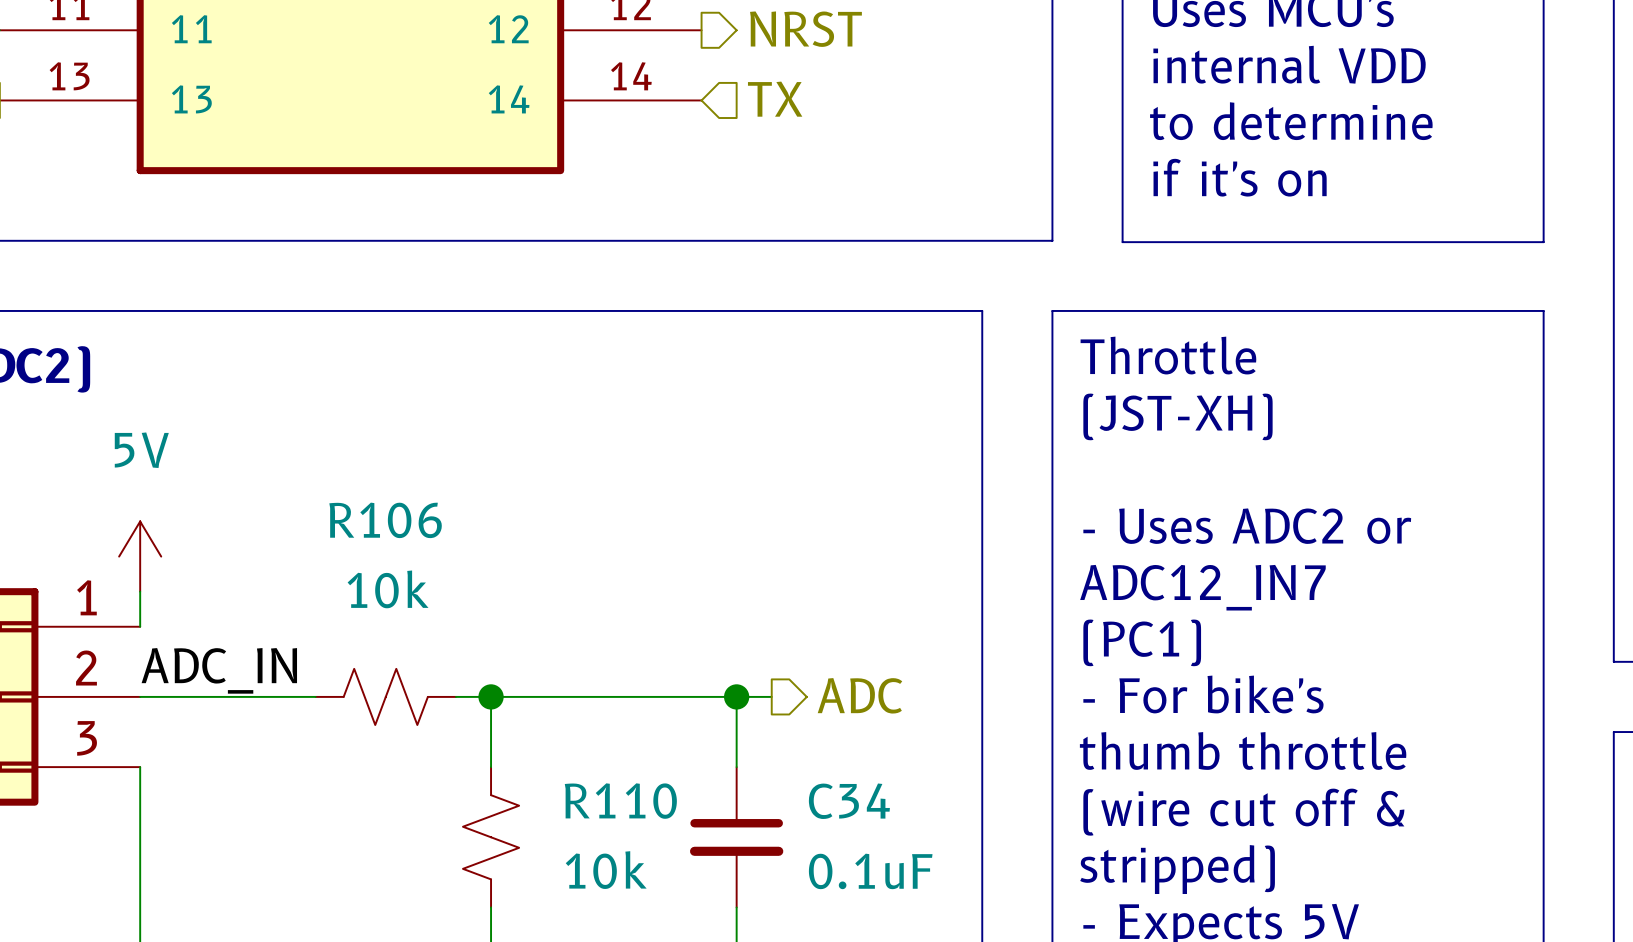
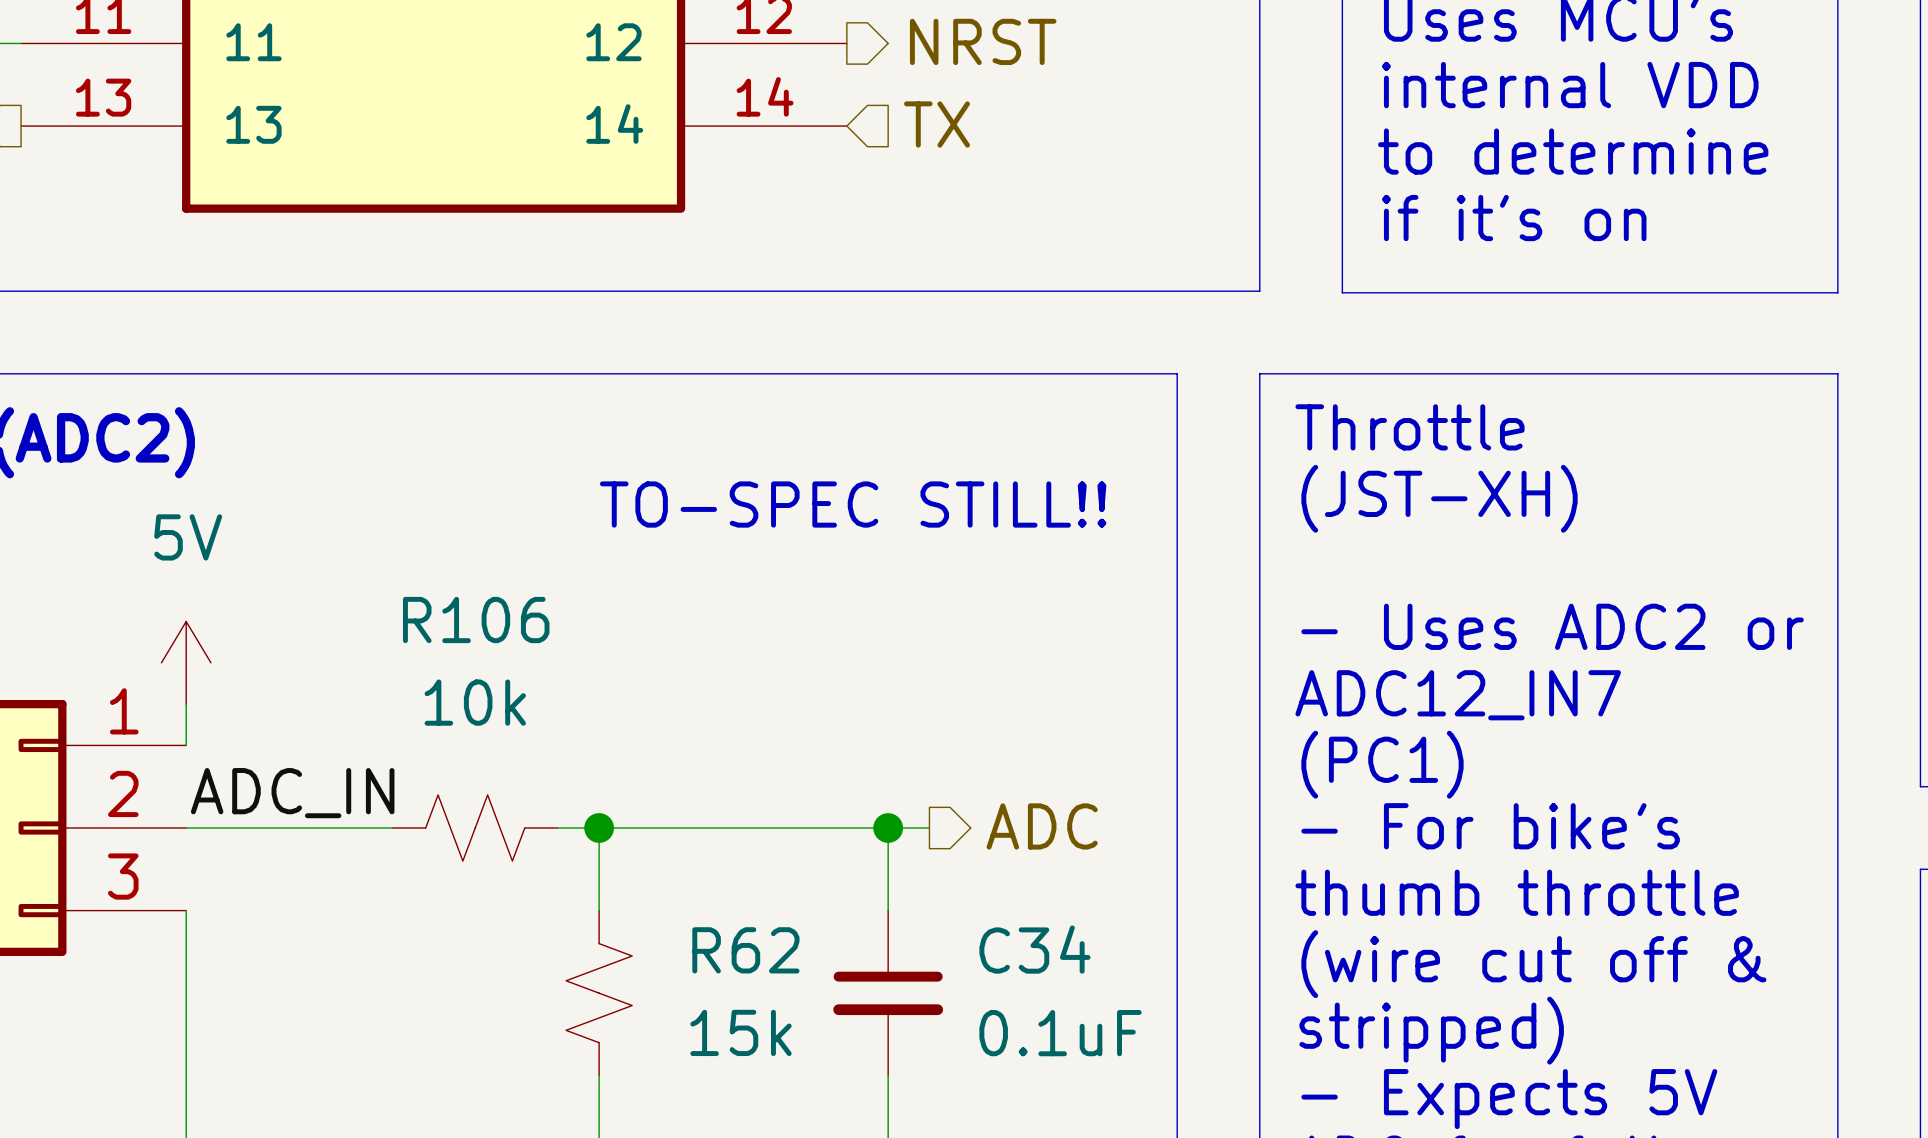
text: none -> TO-SPEC STILL!! (853, 504)
R110 name: R110 (620, 801) -> R62 (745, 950)
R110 value: 10k (606, 870) -> 15k (741, 1032)

